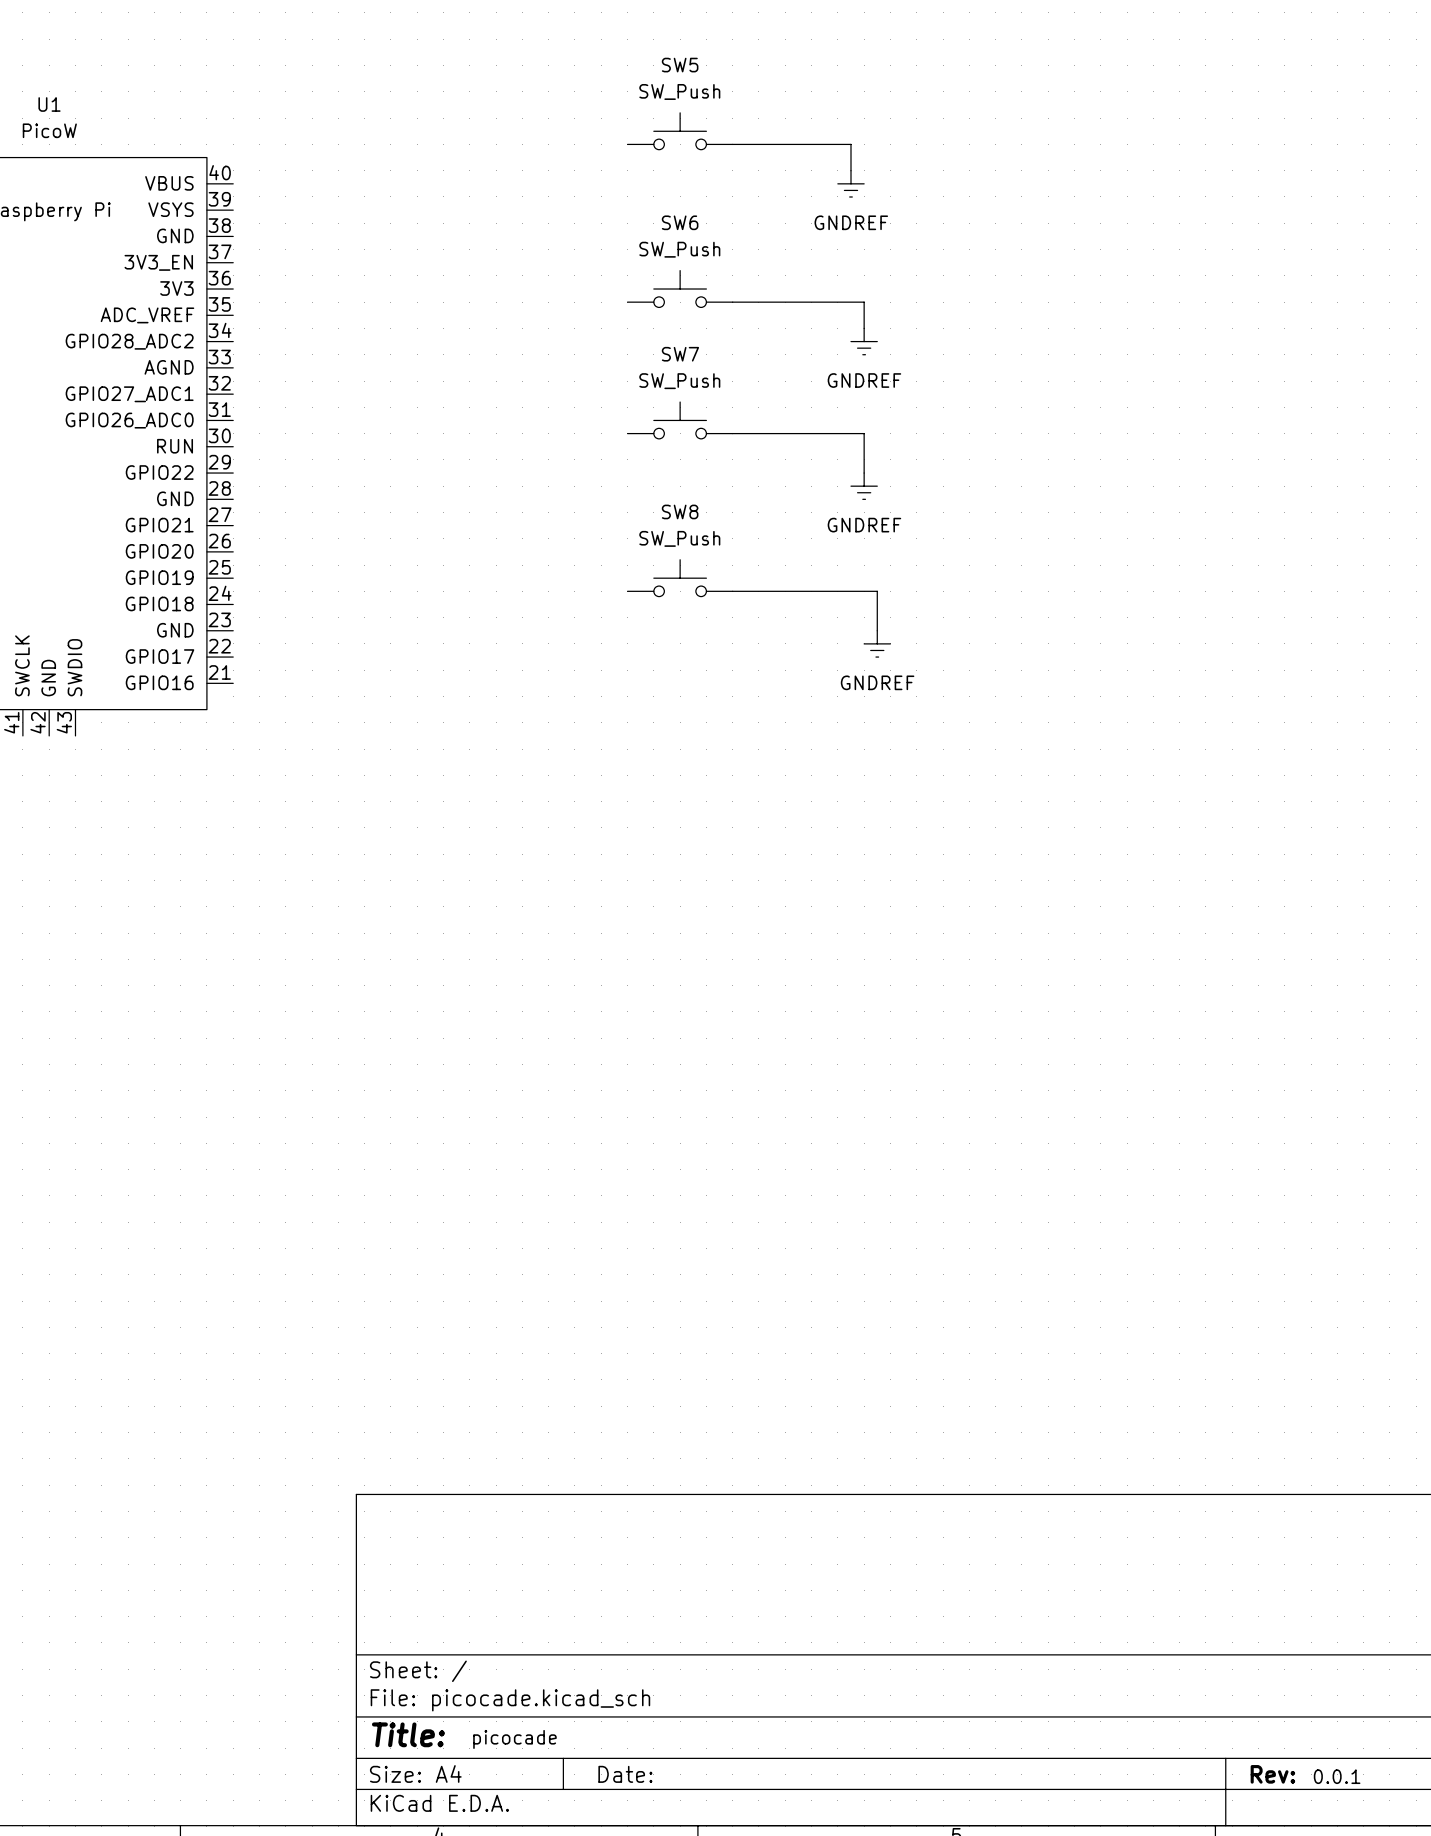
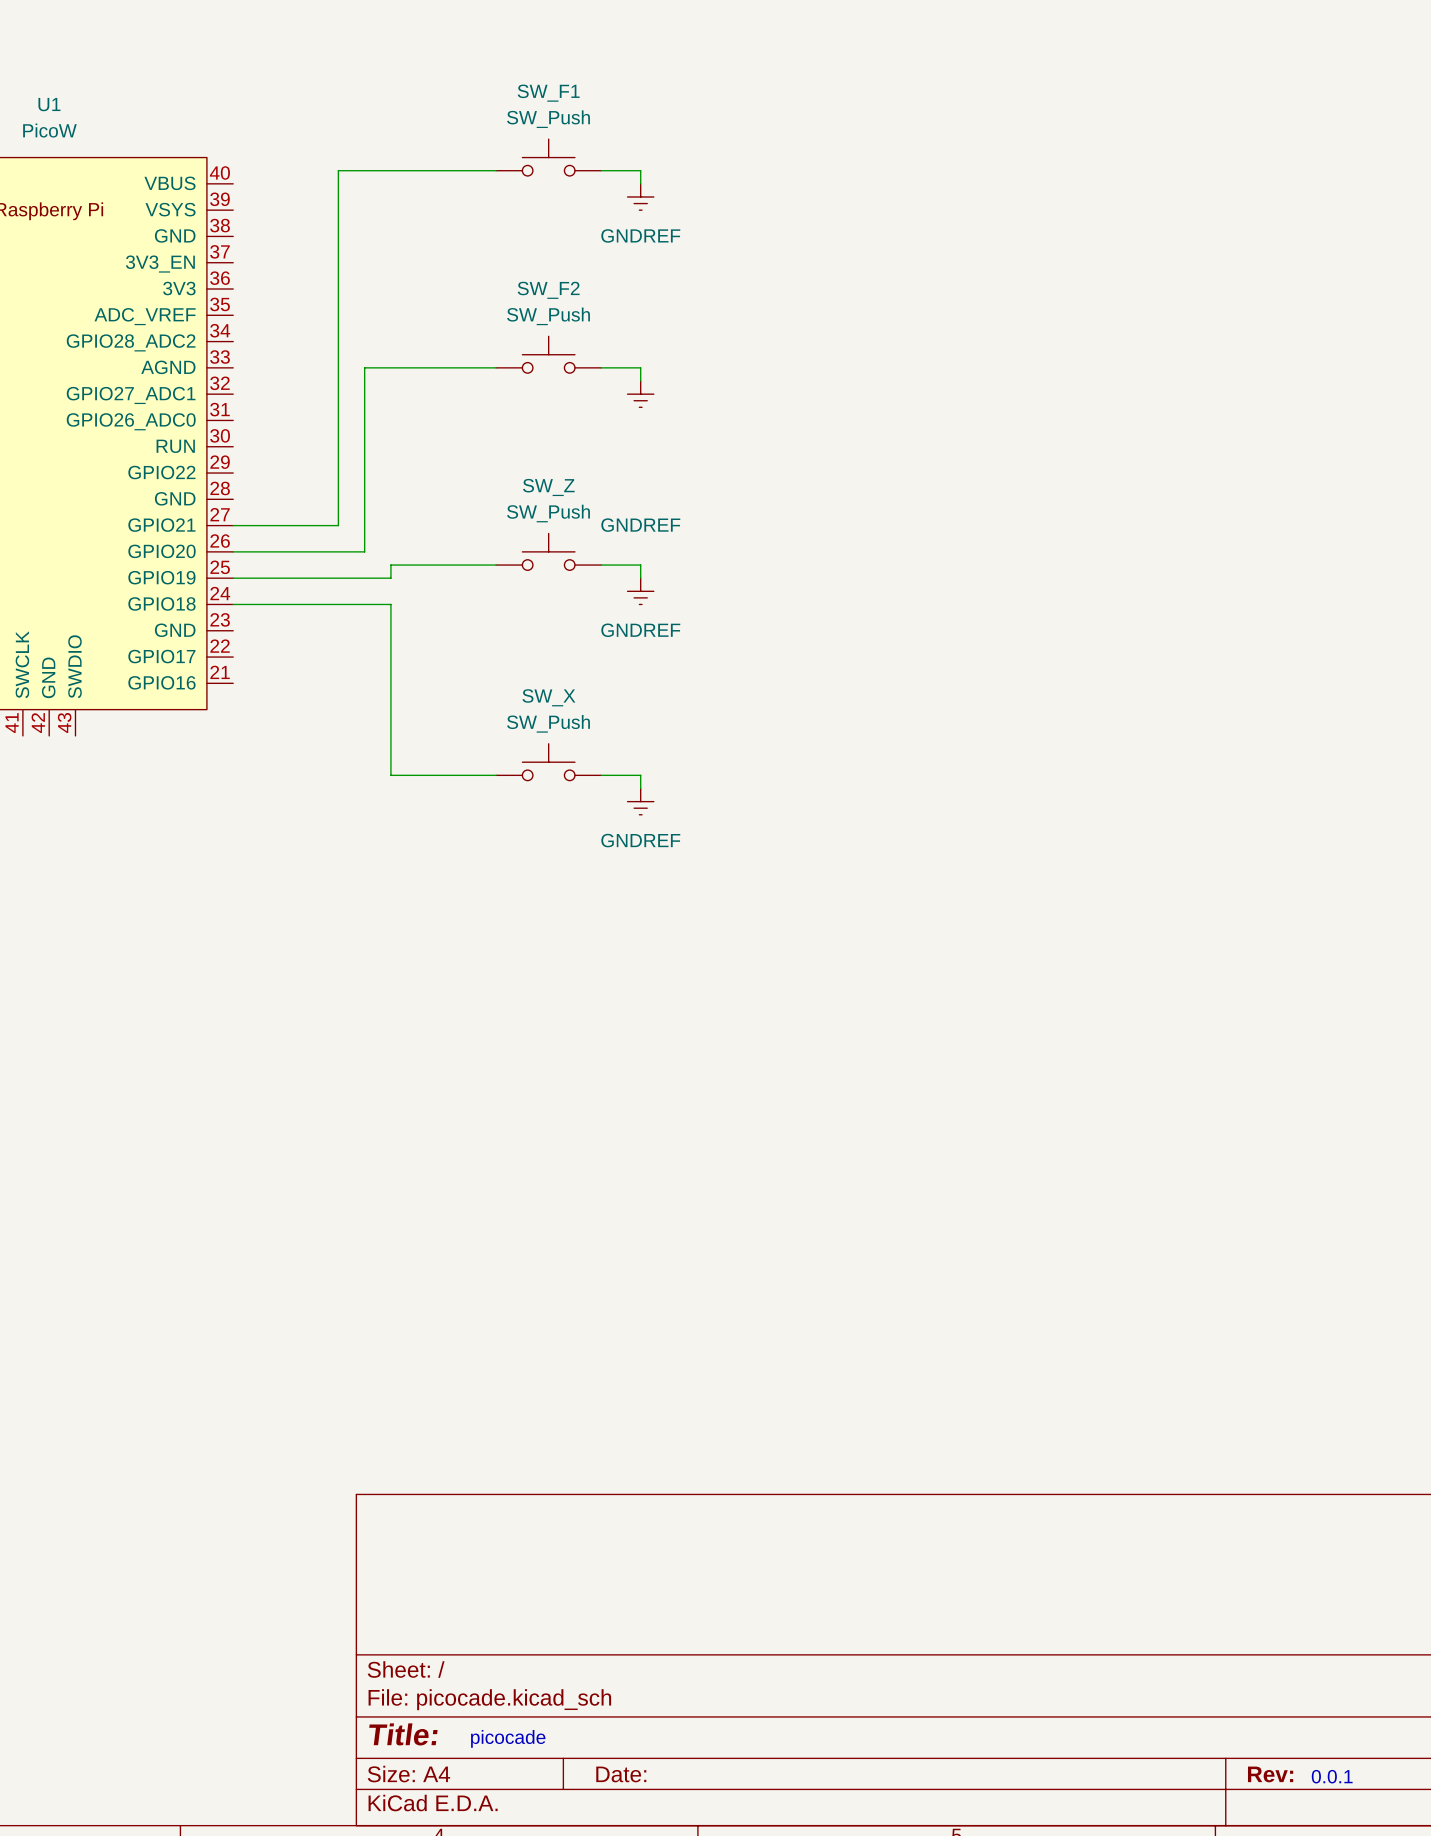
SW5: SW_Push (680, 131) -> none
wire: (732, 144) (850, 144) (850, 170) -> none
SW_F1: none -> SW_Push (548, 157)
wire: none -> (496, 170) (338, 170) (338, 525) (233, 525)
wire: none -> (601, 170) (640, 170) (640, 183)
power symbol: GNDREF (850, 183) -> none
power symbol: none -> GNDREF (640, 196)
SW6: SW_Push (680, 289) -> none
wire: (732, 302) (864, 302) (864, 328) -> none
power symbol: GNDREF (864, 341) -> none
SW_F2: none -> SW_Push (548, 354)
wire: none -> (496, 367) (364, 367) (364, 551) (233, 551)
wire: none -> (601, 367) (640, 367) (640, 381)
power symbol: none -> GNDREF (640, 394)
SW7: SW_Push (680, 420) -> none
wire: (732, 433) (864, 433) (864, 473) -> none
power symbol: GNDREF (864, 486) -> none
SW_Z: none -> SW_Push (548, 551)
wire: none -> (496, 565) (390, 565) (390, 578) (233, 578)
wire: none -> (601, 565) (640, 565) (640, 578)
SW8: SW_Push (680, 578) -> none
power symbol: none -> GNDREF (640, 591)
wire: (732, 591) (877, 591) (877, 630) -> none
wire: none -> (233, 604) (390, 604) (390, 775) (496, 775)
power symbol: GNDREF (877, 643) -> none
SW_X: none -> SW_Push (548, 762)
wire: none -> (601, 775) (640, 775) (640, 788)
power symbol: none -> GNDREF (640, 801)

